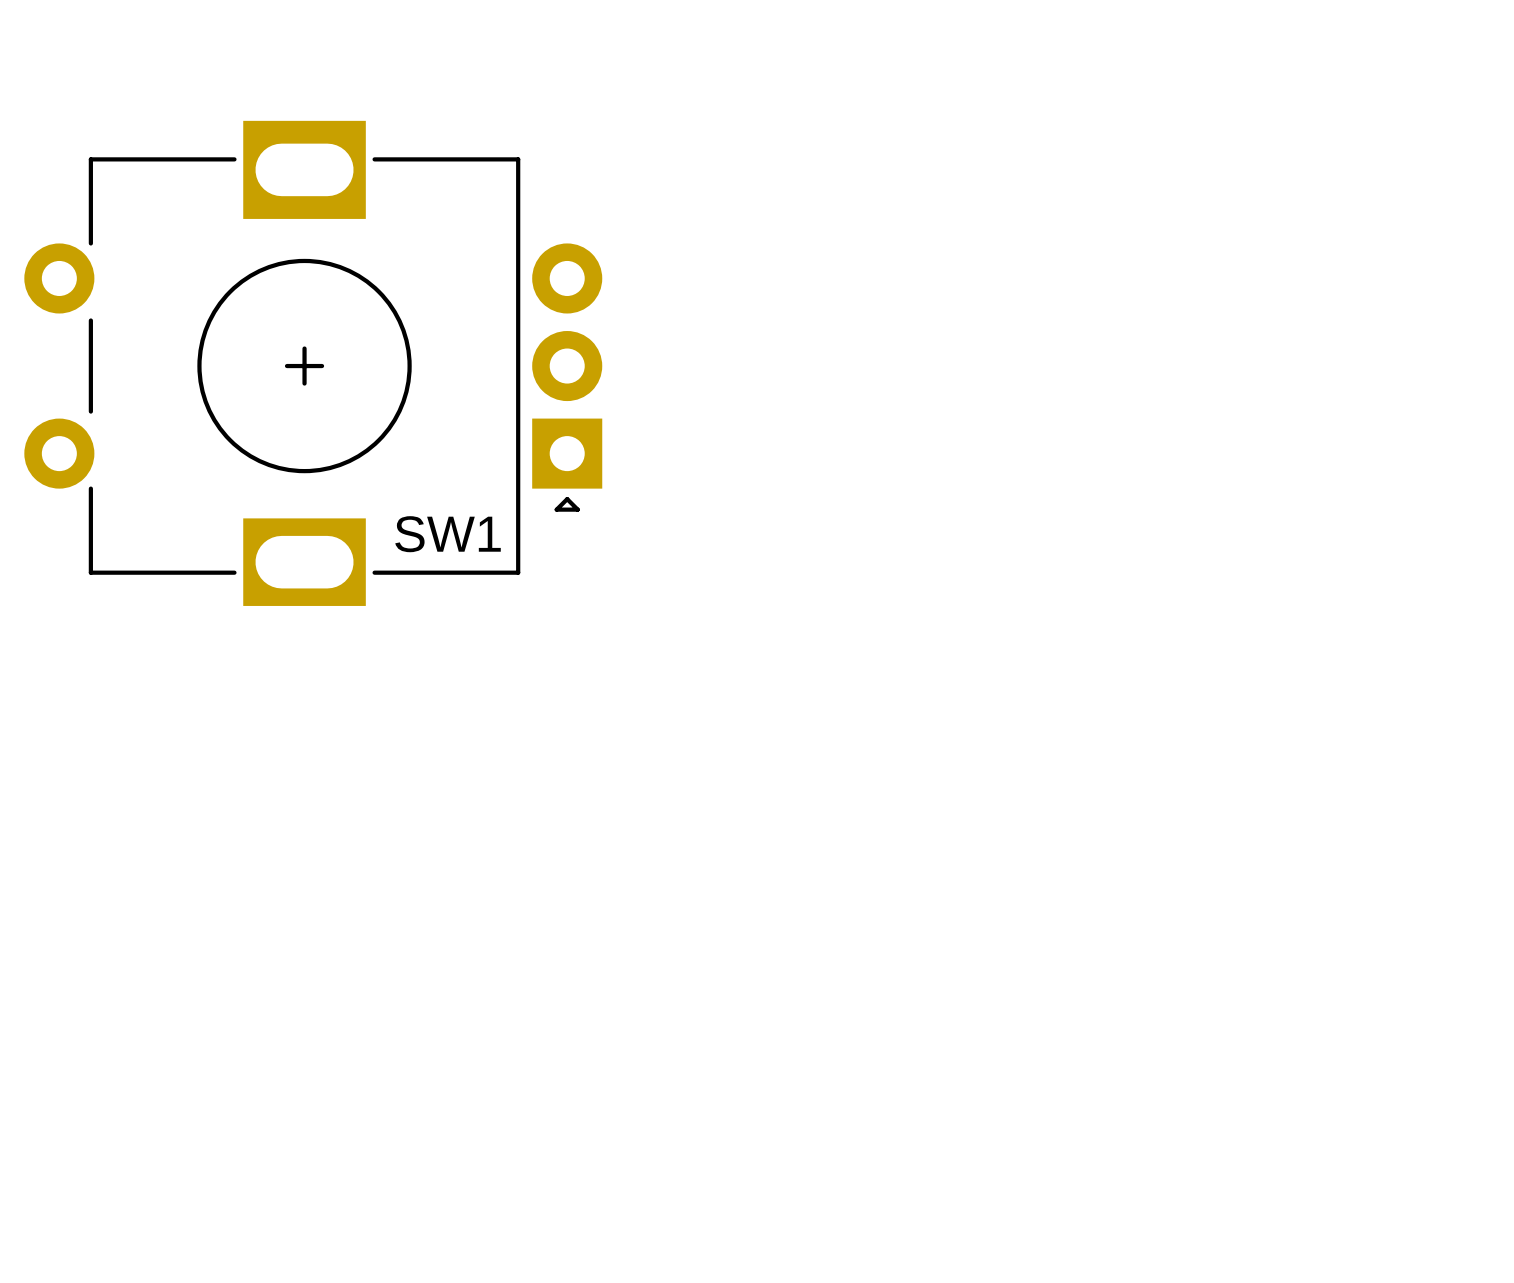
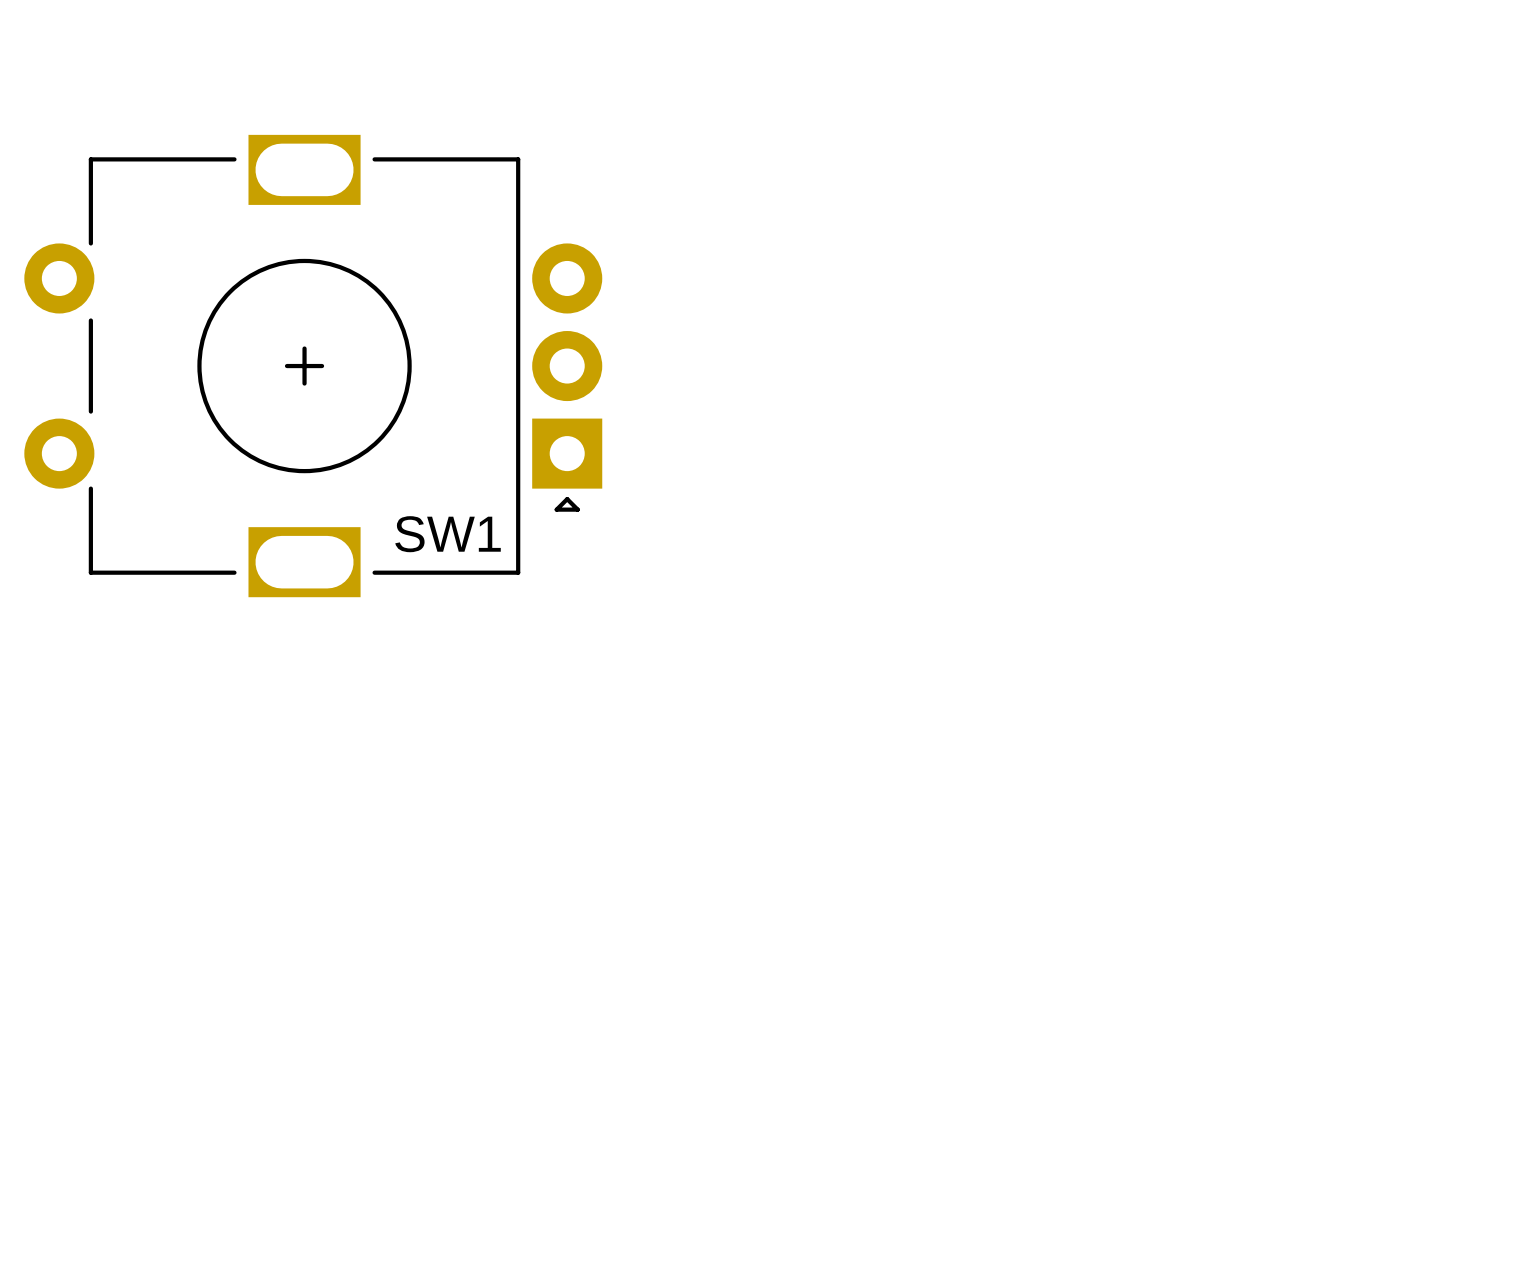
SW1 footprint: [24, 120, 603, 606] -> [24, 134, 603, 598]

